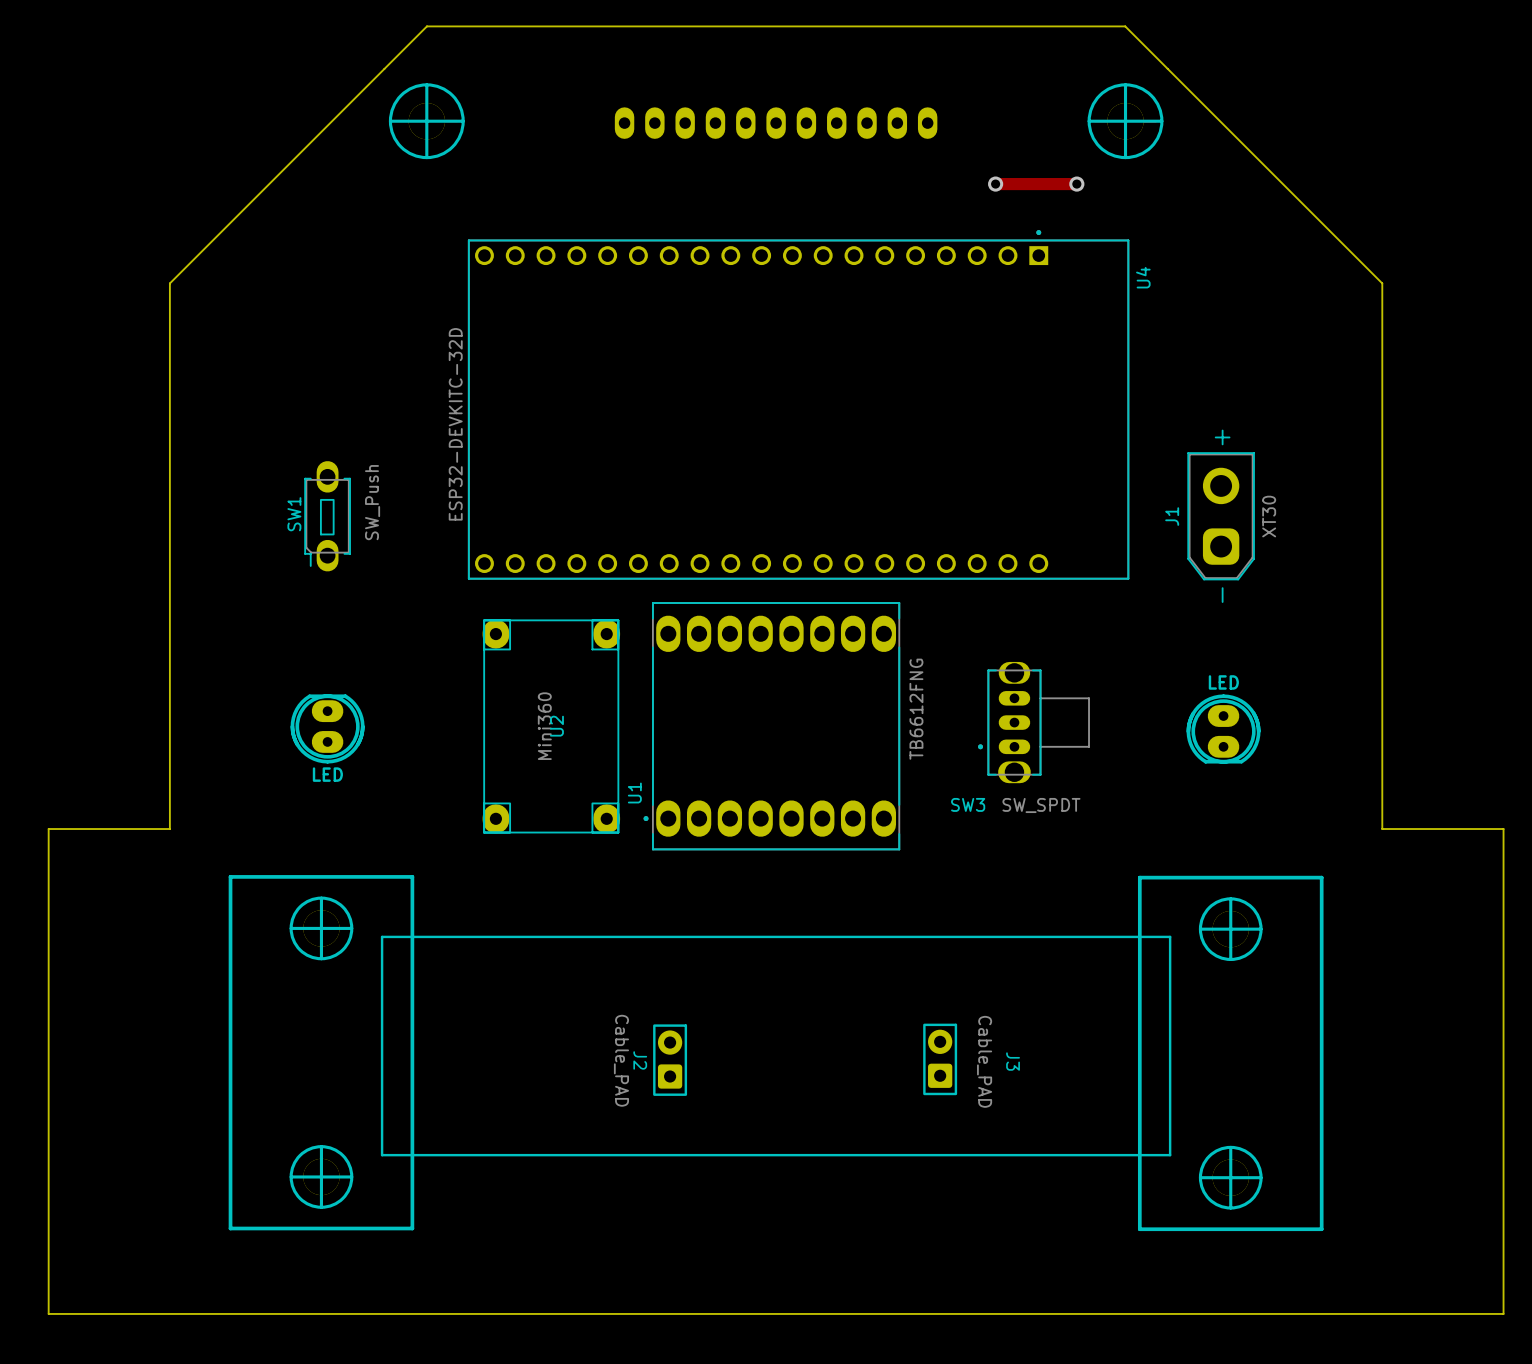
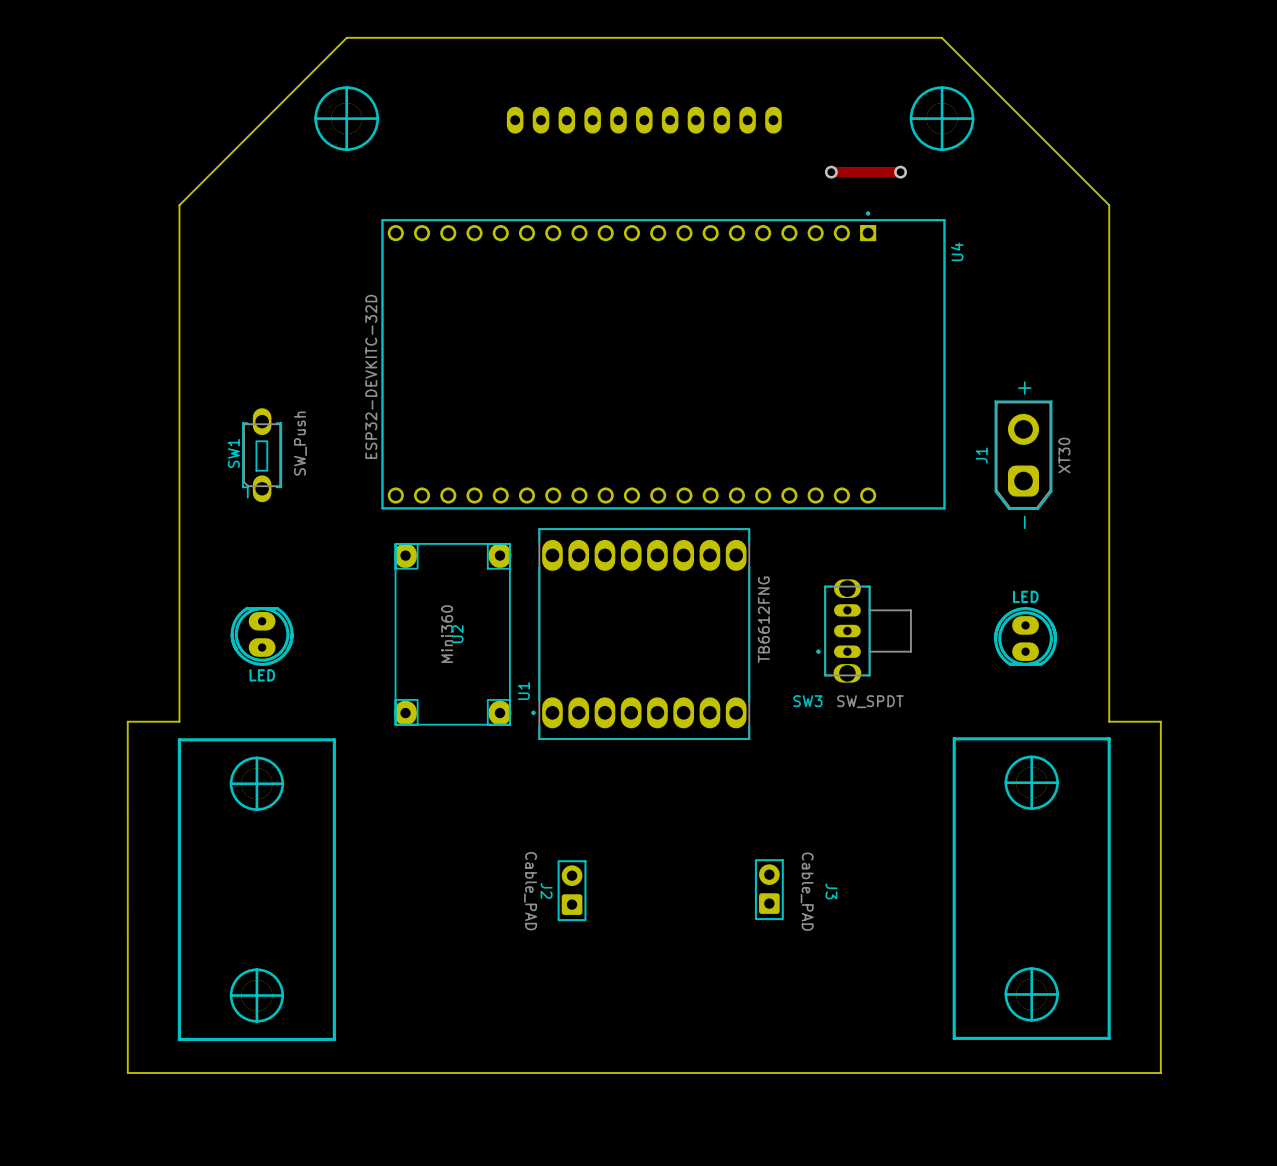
board edge: (426, 26) (169, 283) (169, 829) (48, 829) (48, 1313) (1503, 1313) (1503, 829) (1382, 829) (1382, 283) (1321, 222) -> (346, 37) (179, 205) (179, 721) (127, 721) (127, 1073) (1160, 1073) (1160, 721) (1109, 721) (1109, 205)
line: (382, 936) (1170, 936) (1170, 1155) (382, 1155) (382, 936) -> none
part position: (321, 1052) -> (256, 889)
part position: (1230, 1053) -> (1031, 888)
J3 position: (940, 1059) -> (769, 889)
J2 position: (670, 1060) -> (572, 890)

